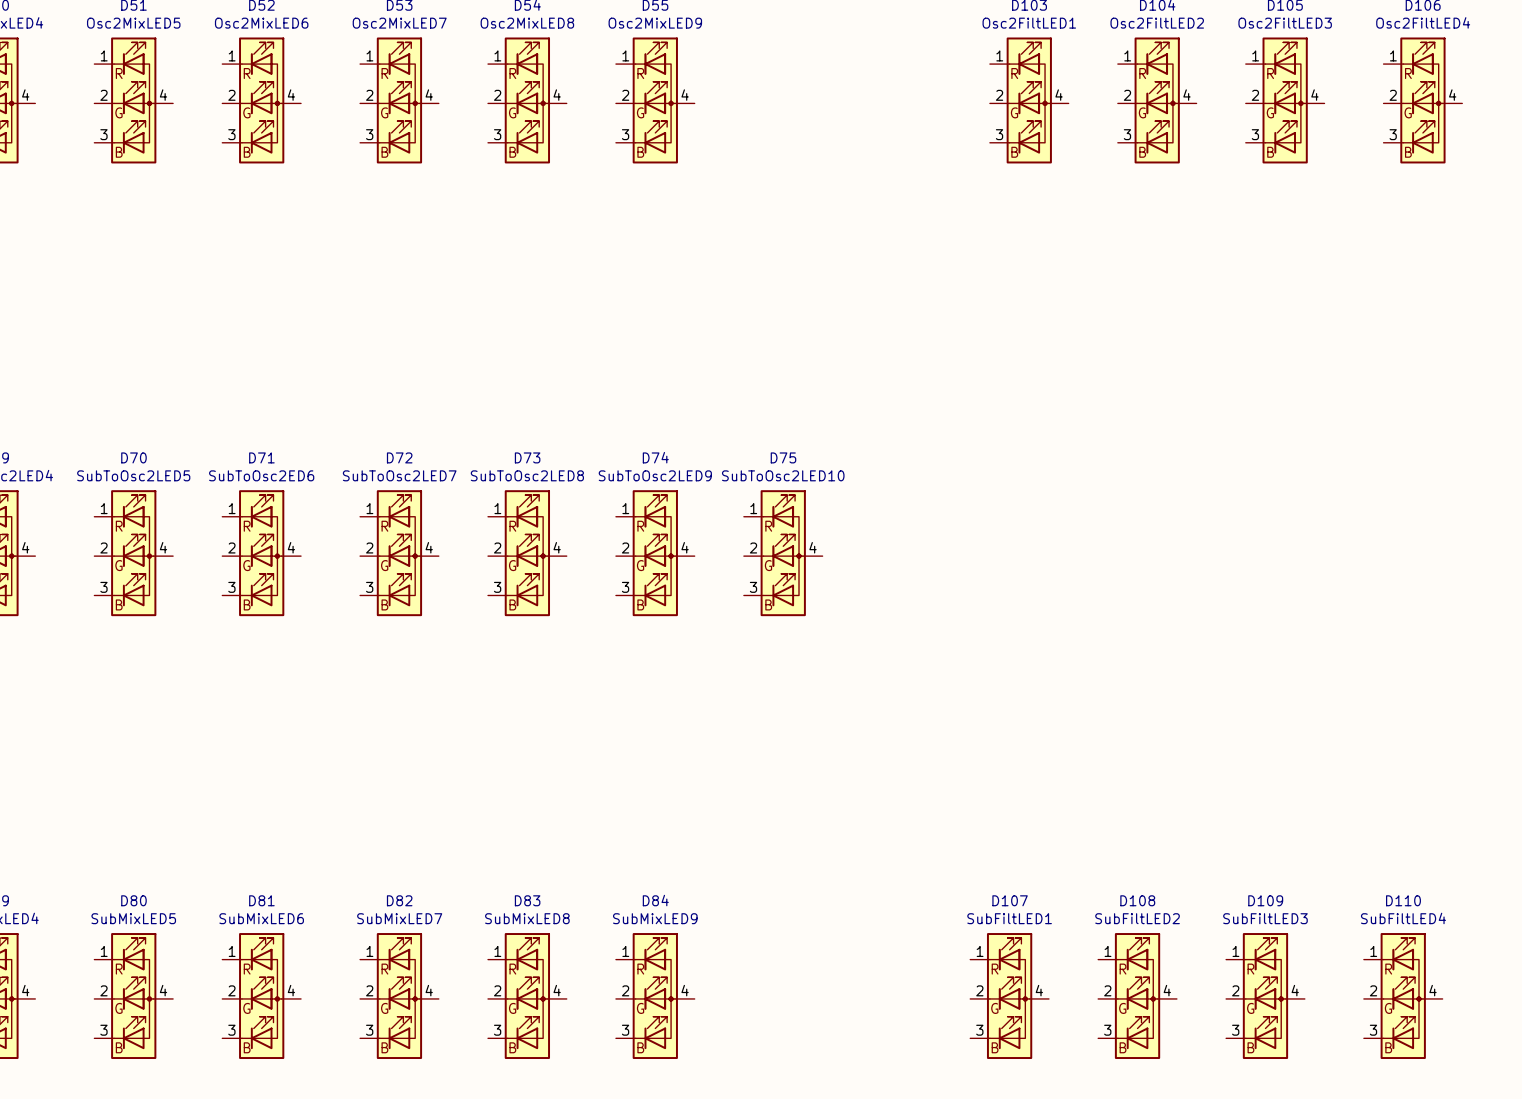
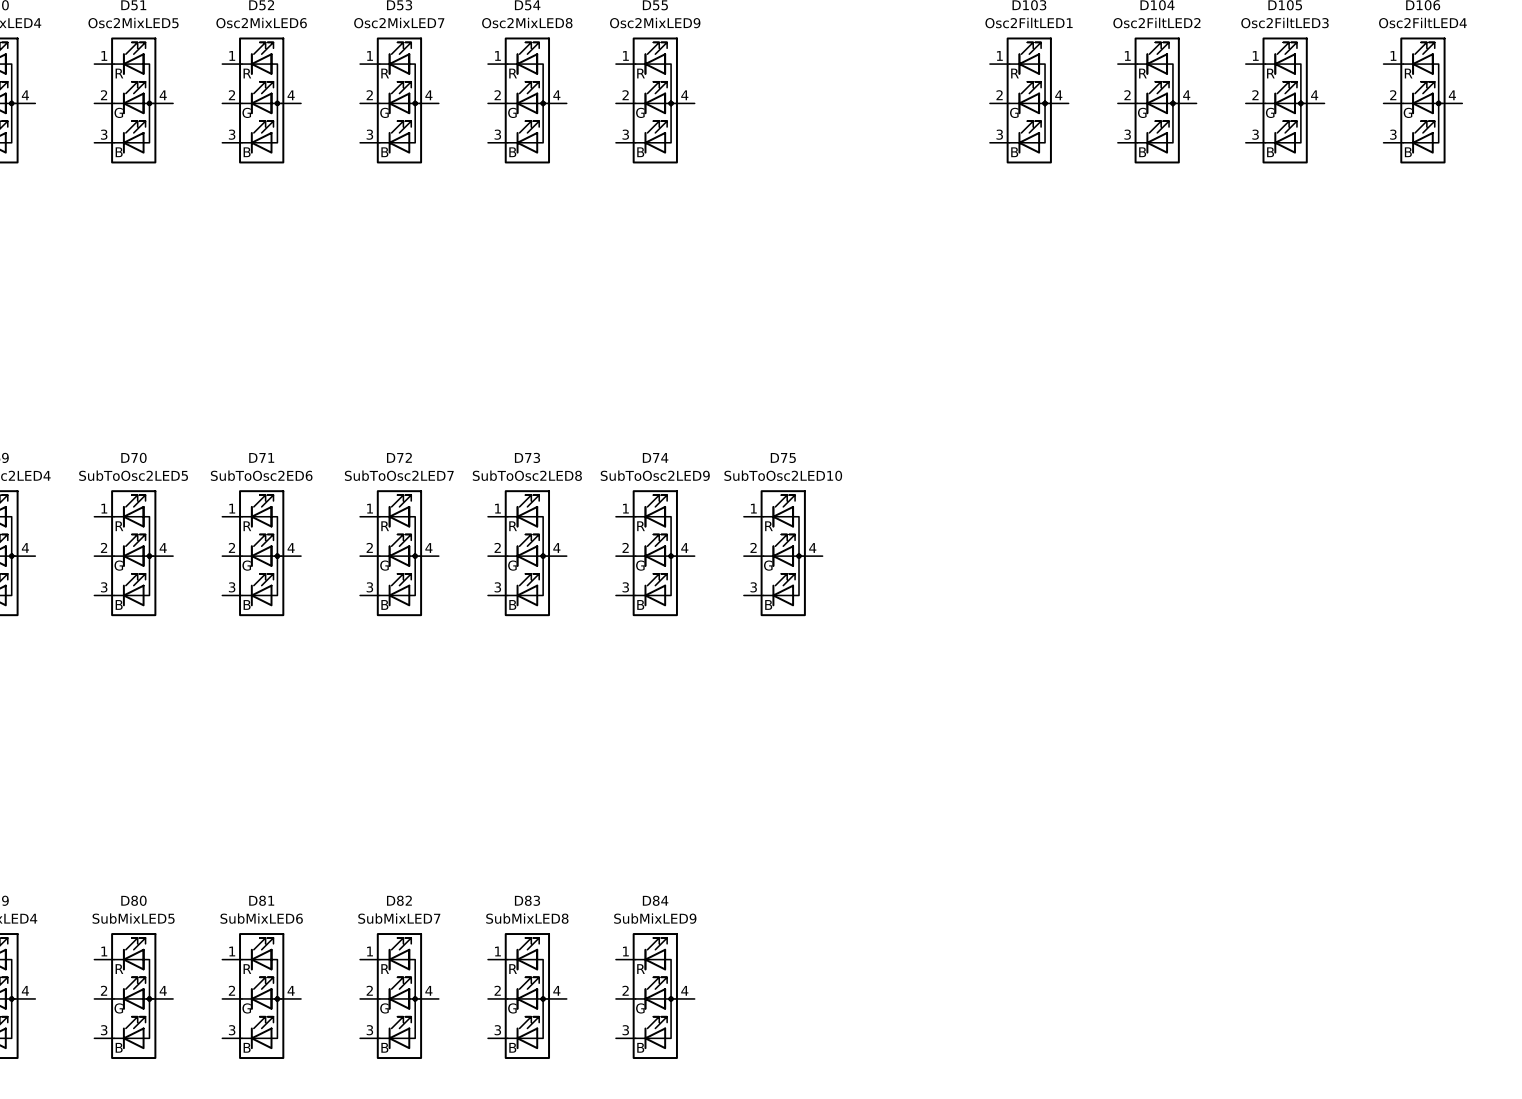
D107: SubFiltLED1 (1009, 996) -> none
D108: SubFiltLED2 (1137, 996) -> none
D109: SubFiltLED3 (1265, 996) -> none
D110: SubFiltLED4 (1403, 996) -> none

